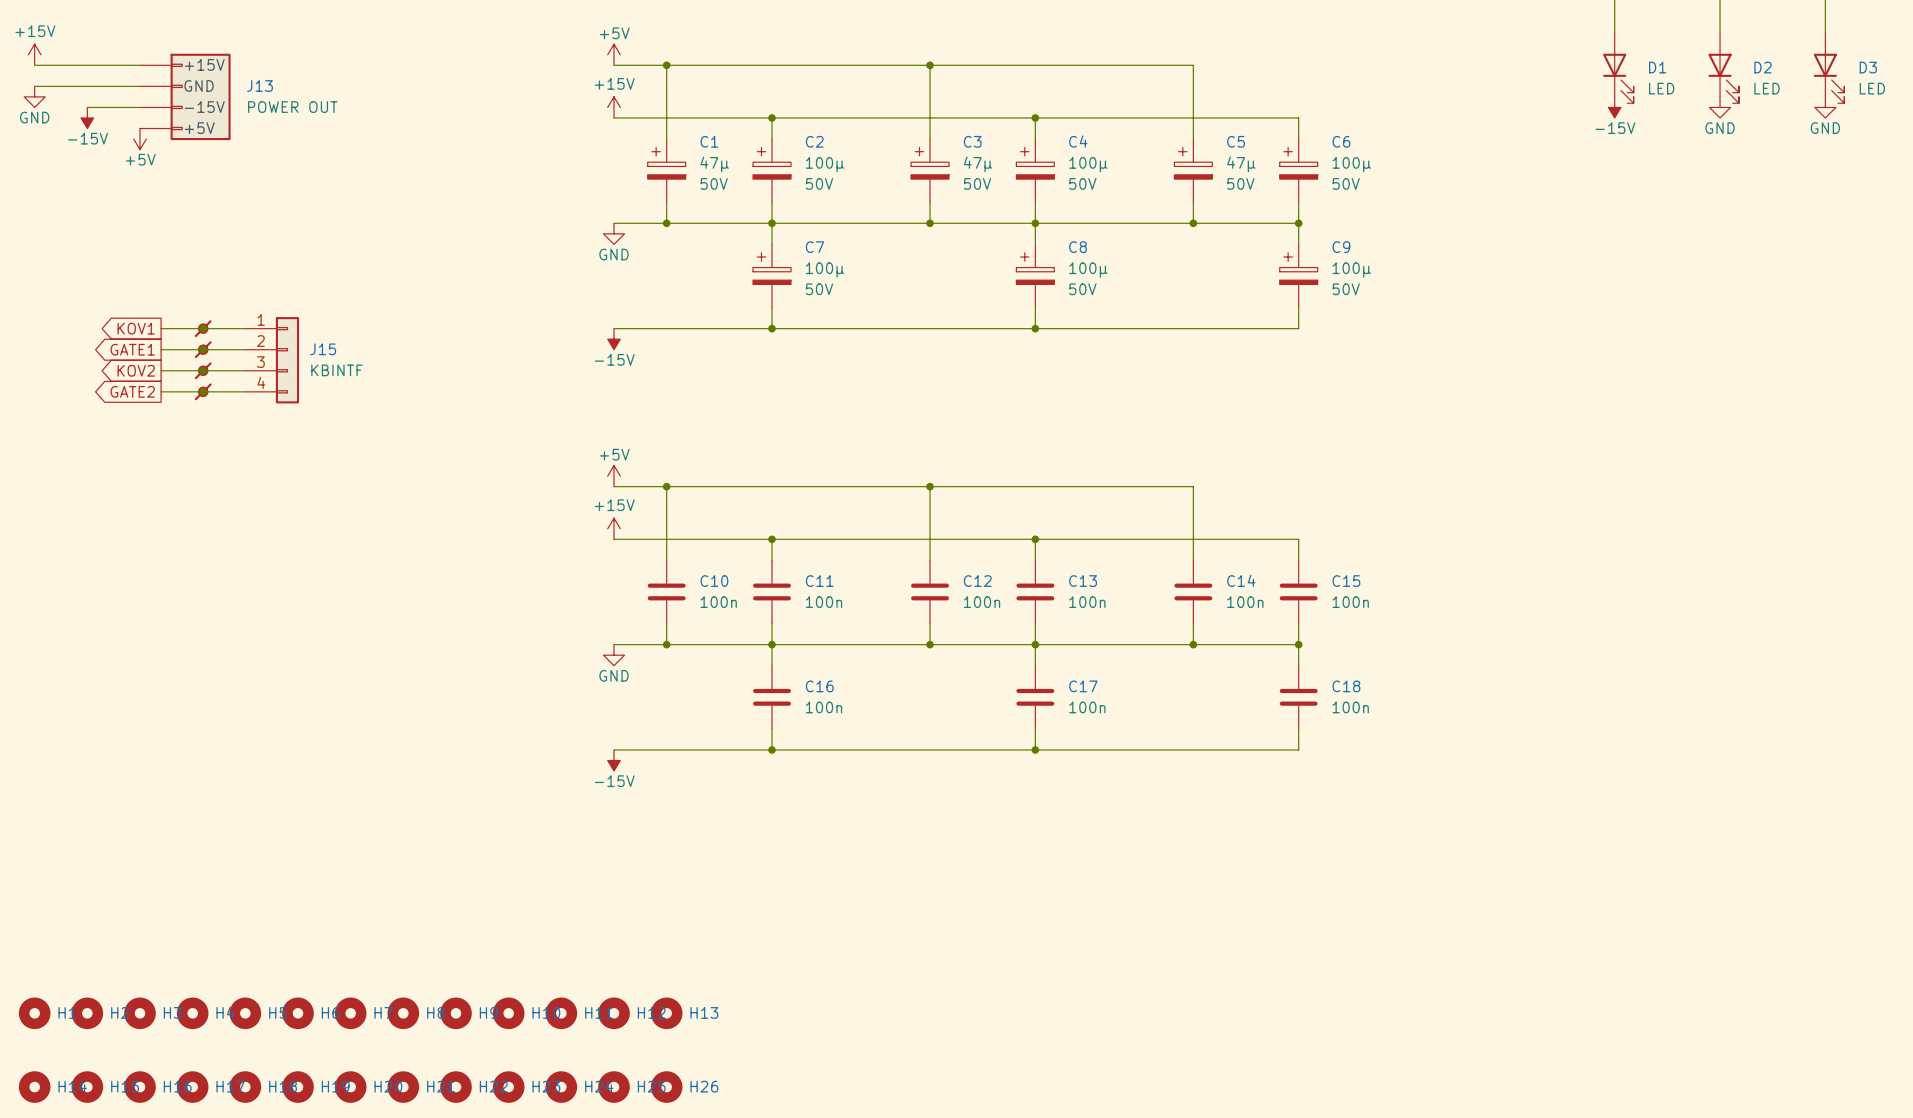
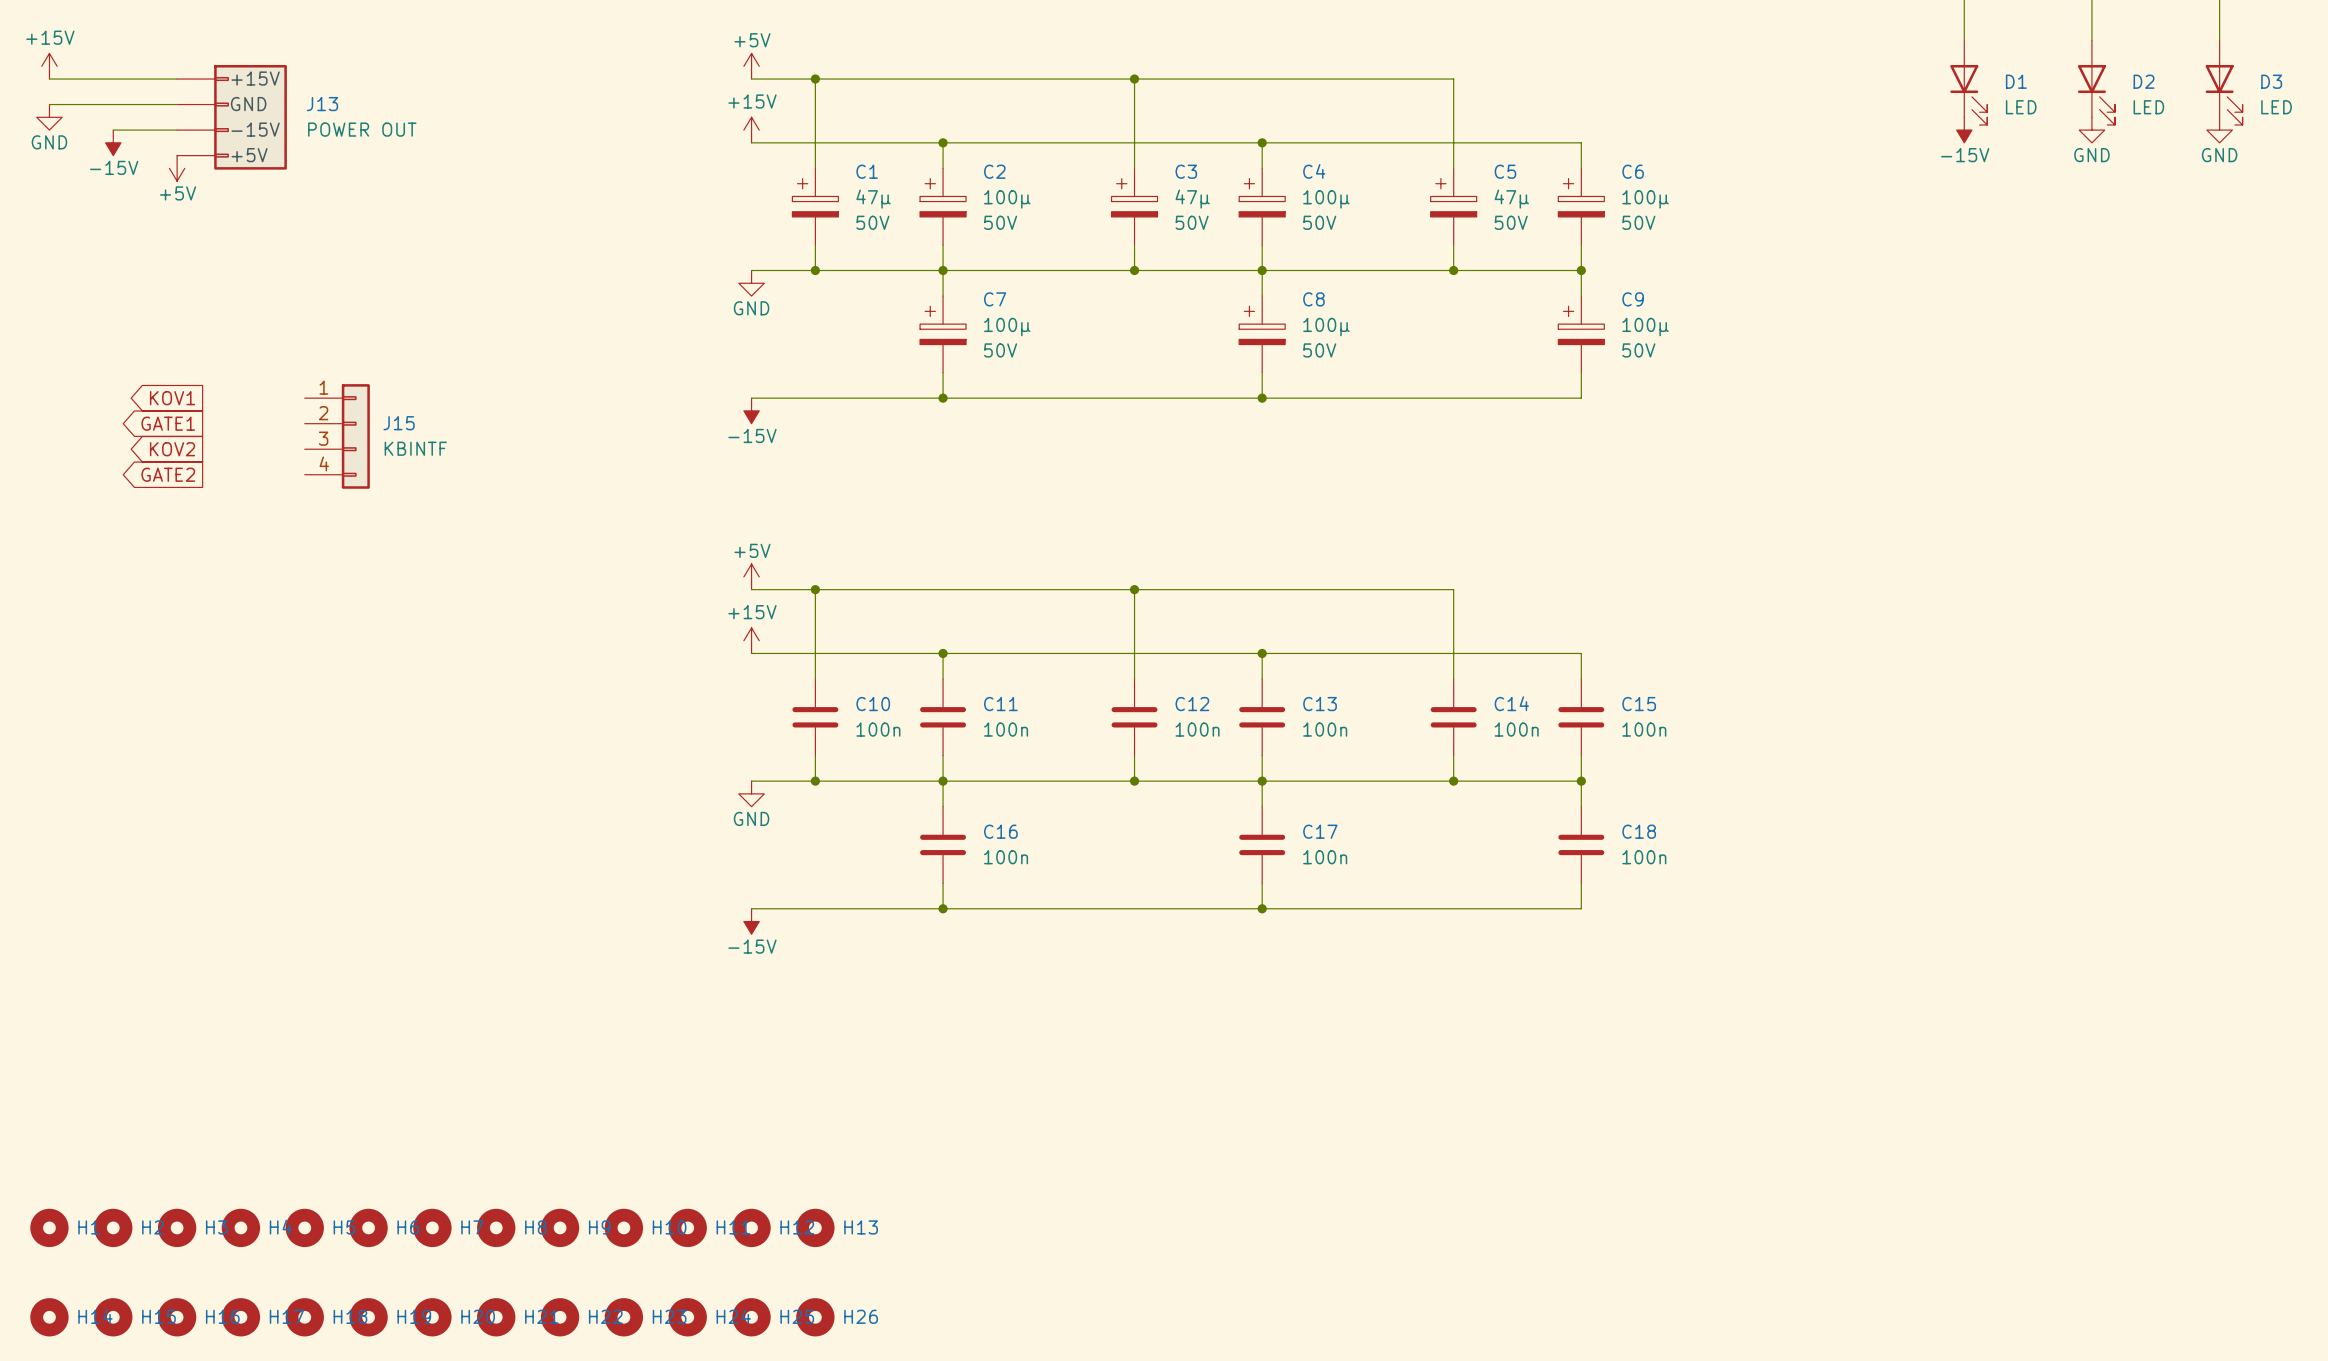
wire: (161, 328) (245, 328) -> none
junction: (203, 328) -> none
part: (203, 328) -> none
wire: (161, 349) (245, 349) -> none
junction: (203, 349) -> none
part: (203, 349) -> none
wire: (161, 370) (245, 370) -> none
junction: (203, 370) -> none
part: (203, 370) -> none
wire: (161, 391) (245, 391) -> none
junction: (203, 391) -> none
part: (203, 391) -> none

